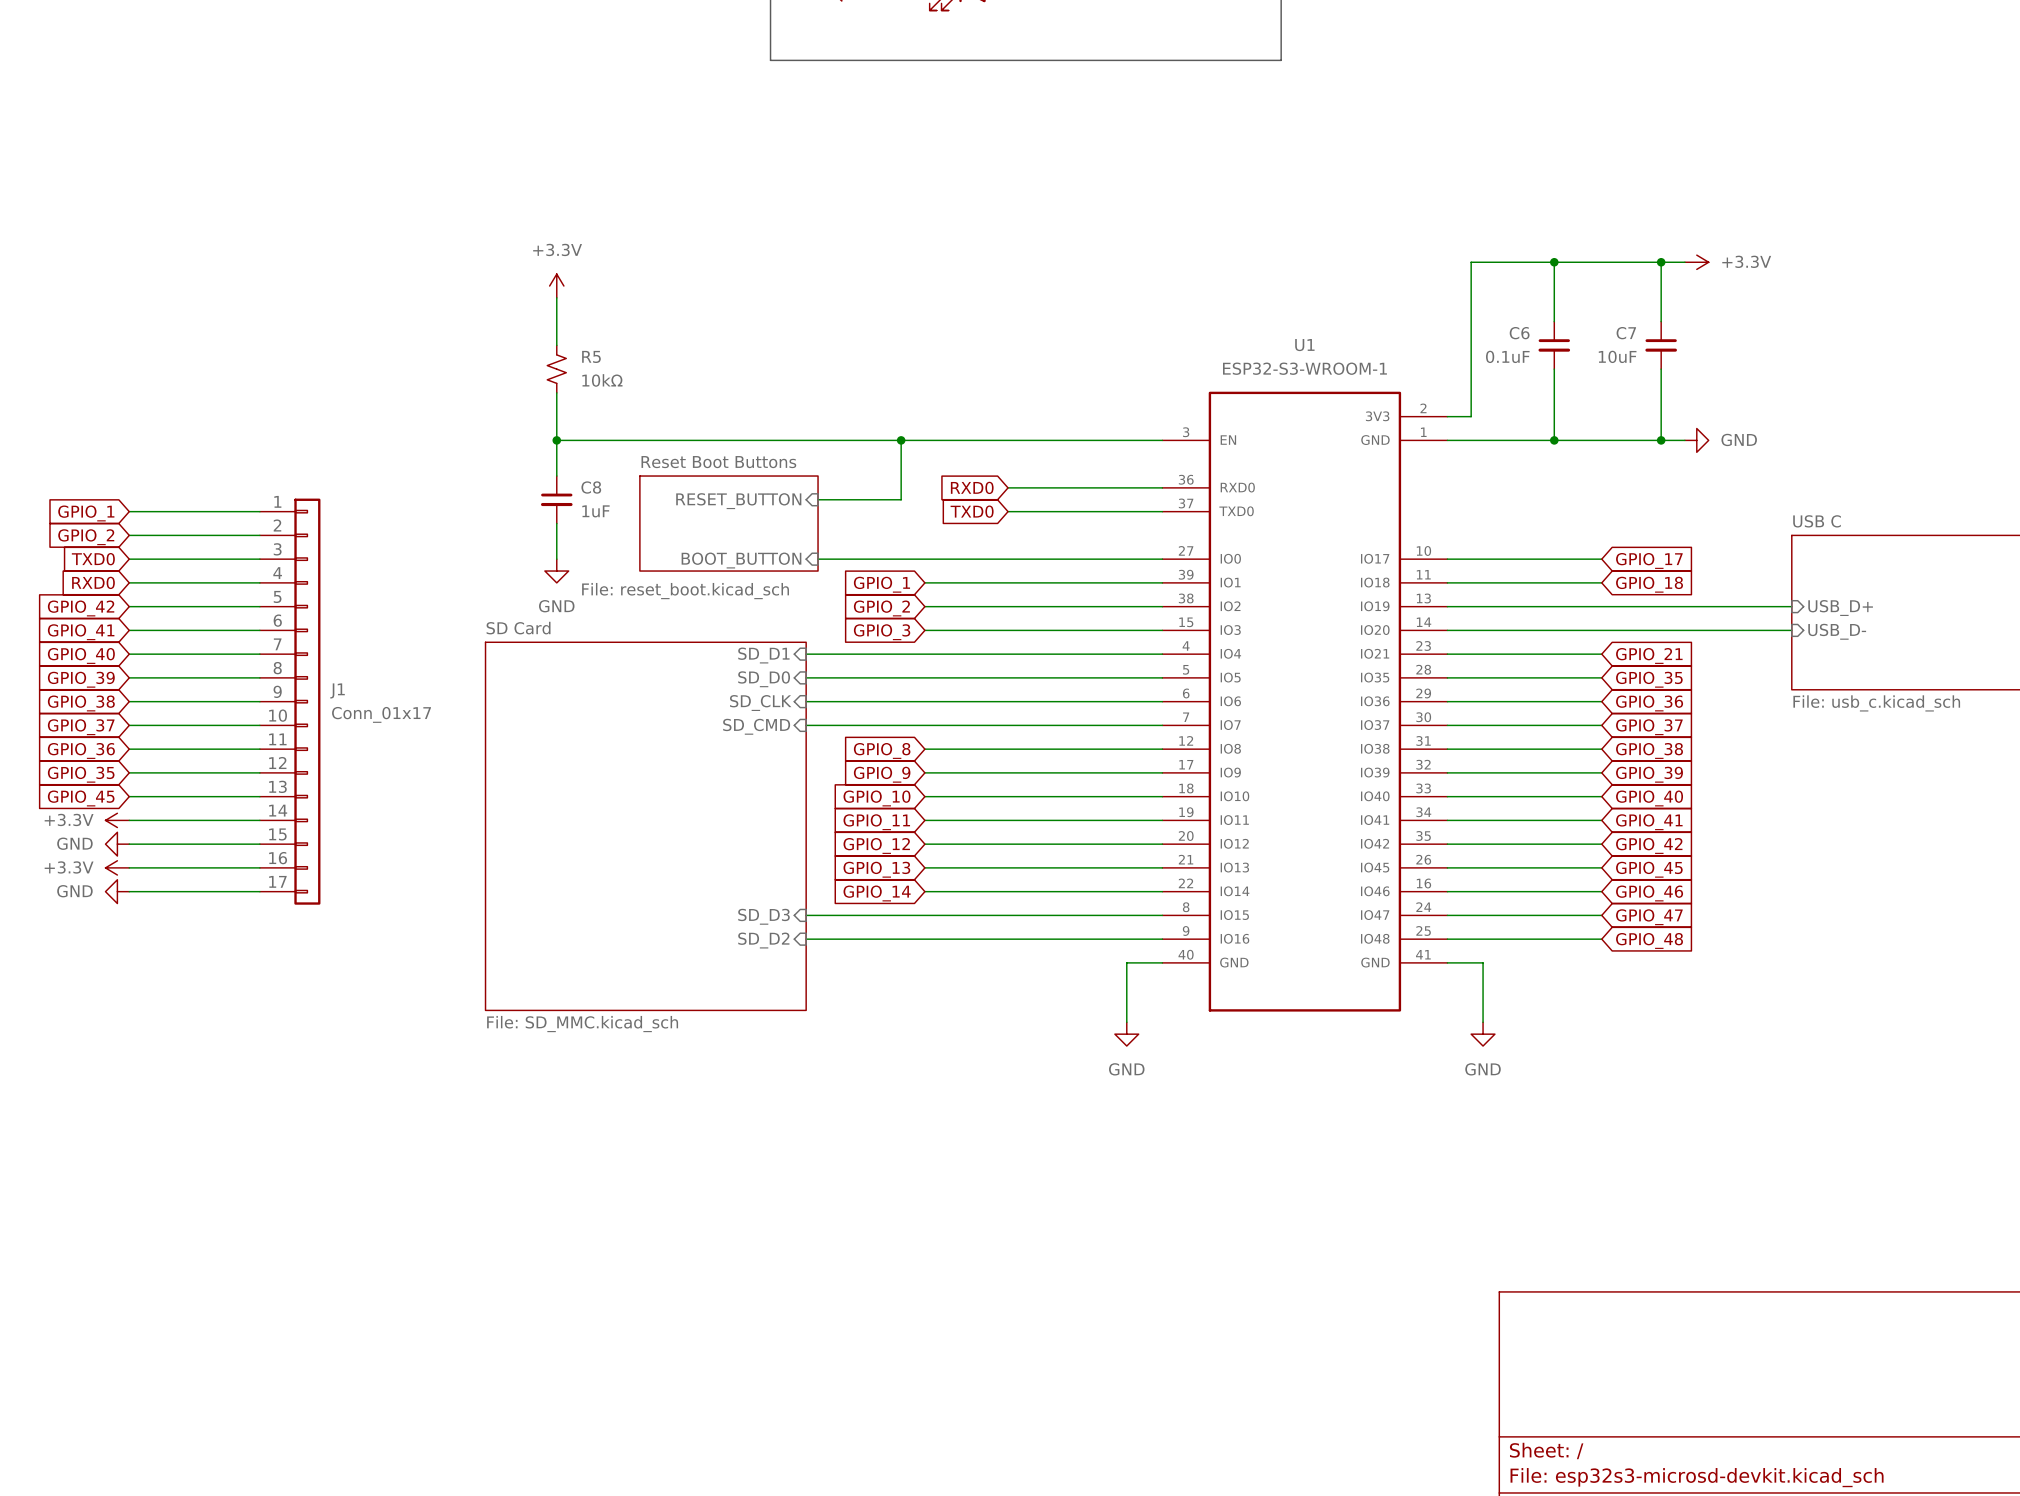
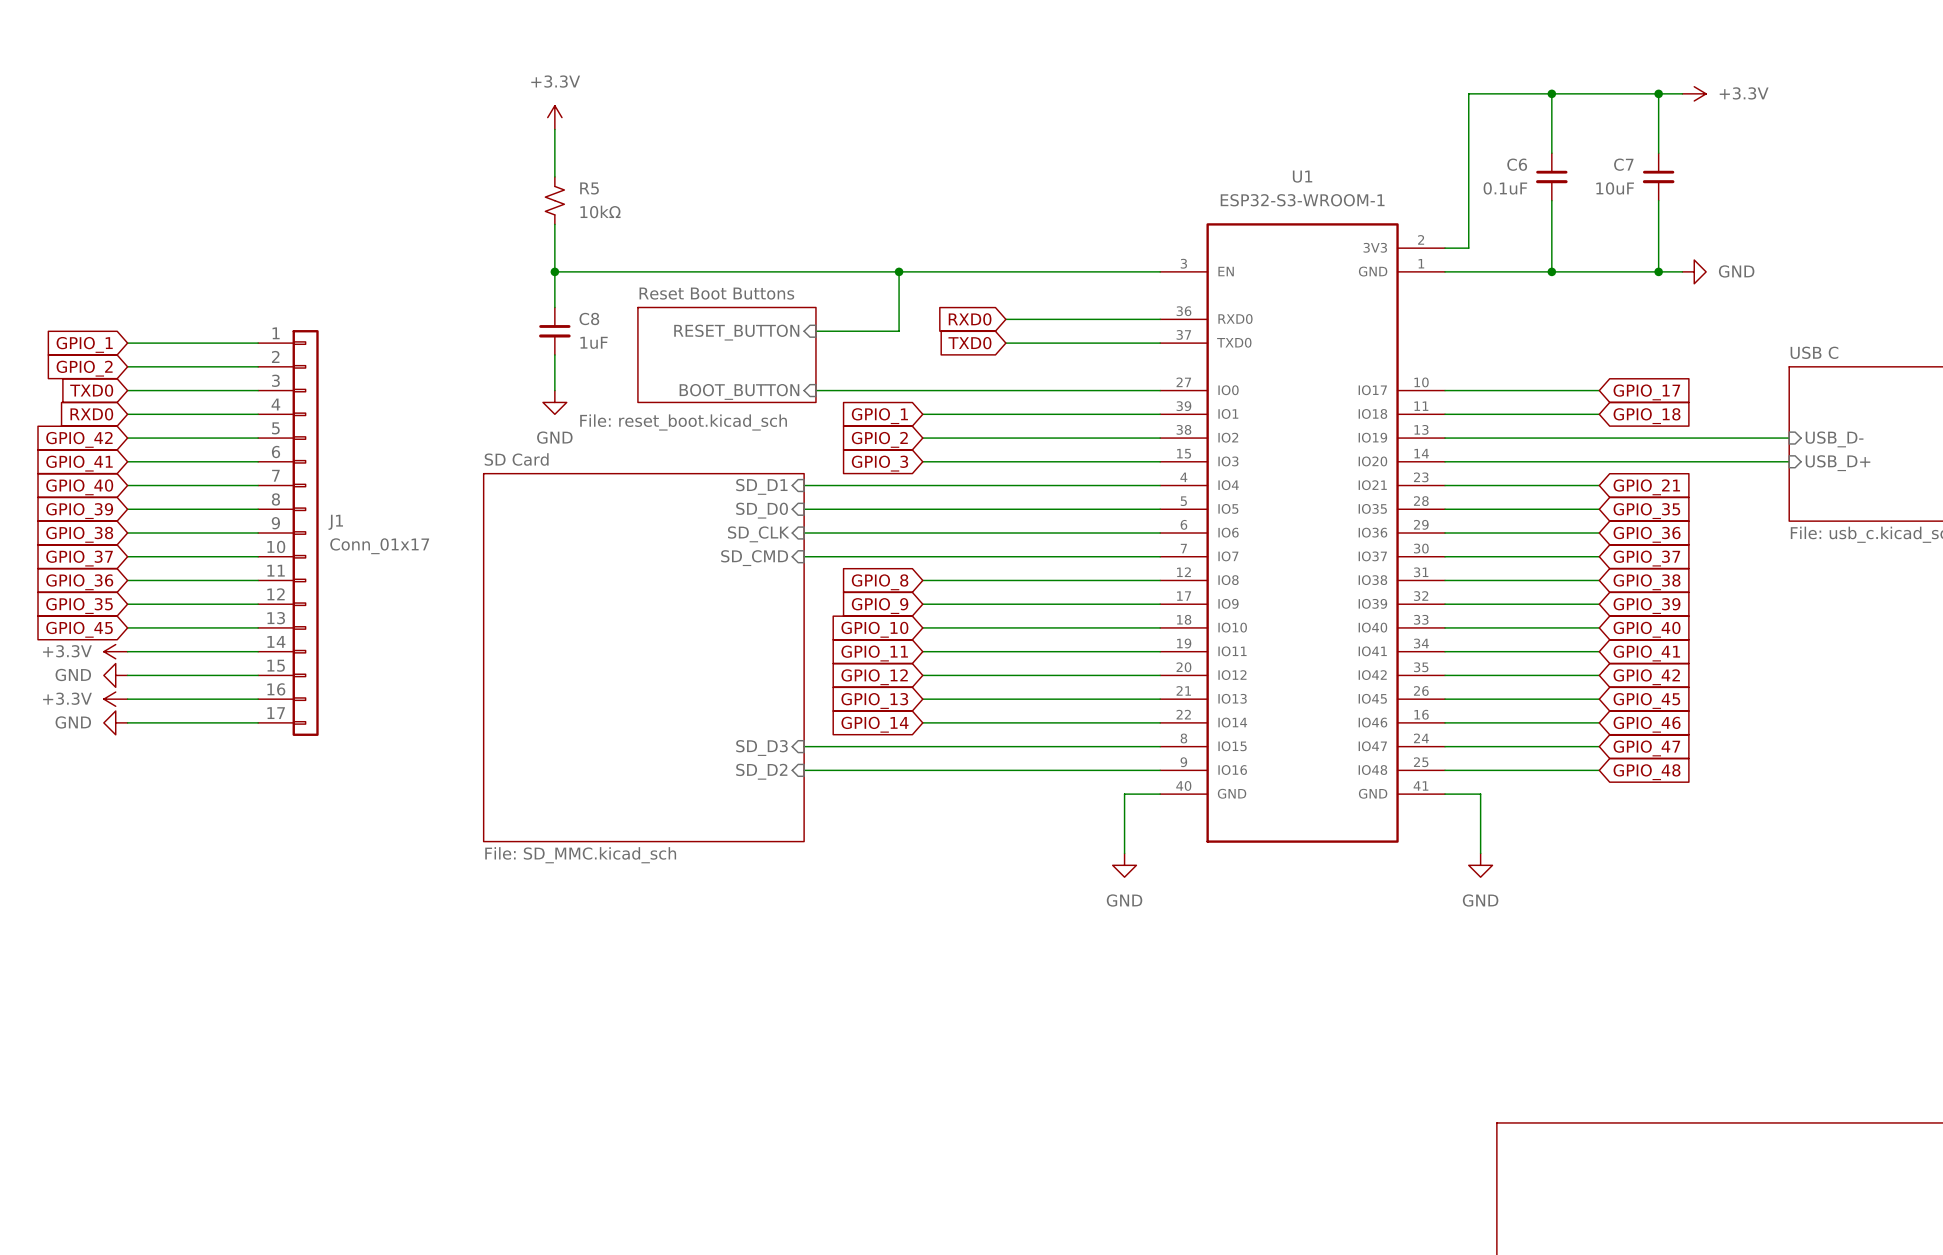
sheet pin: USB_D+ (1840, 608) -> USB_D- (1834, 439)
sheet pin: USB_D- (1837, 631) -> USB_D+ (1837, 463)

